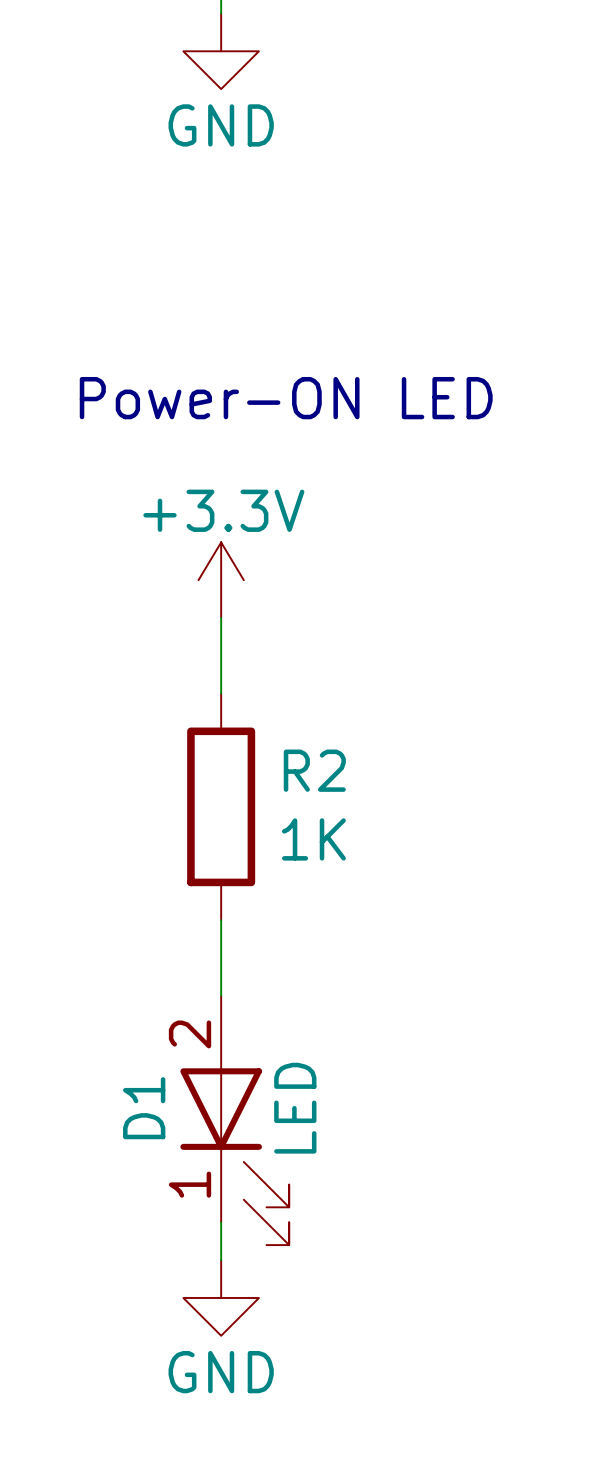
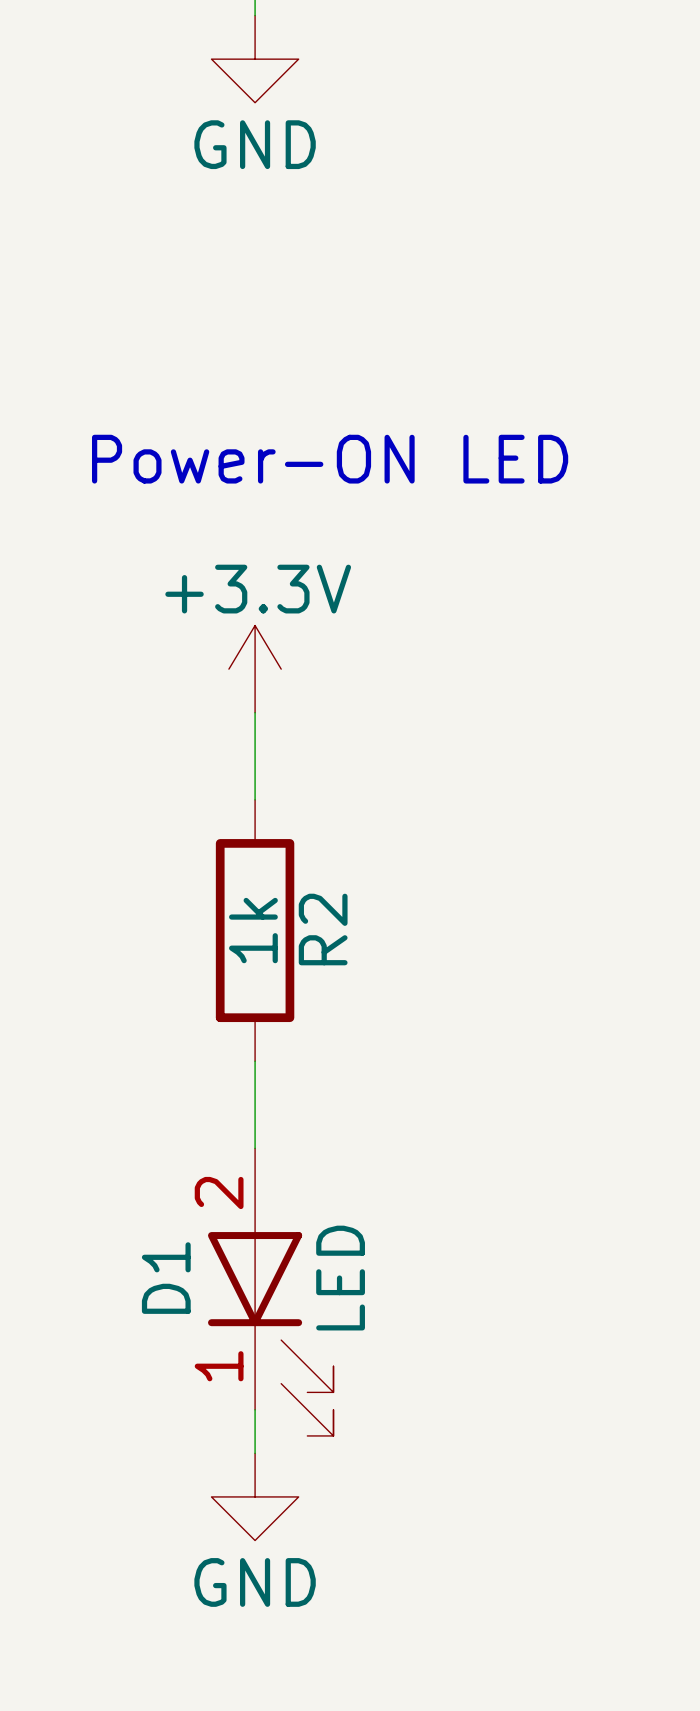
R2 name rotation: 0° (314, 770) -> 90° counterclockwise (323, 929)
R2 value: 1K (313, 839) -> 1k (253, 930)

